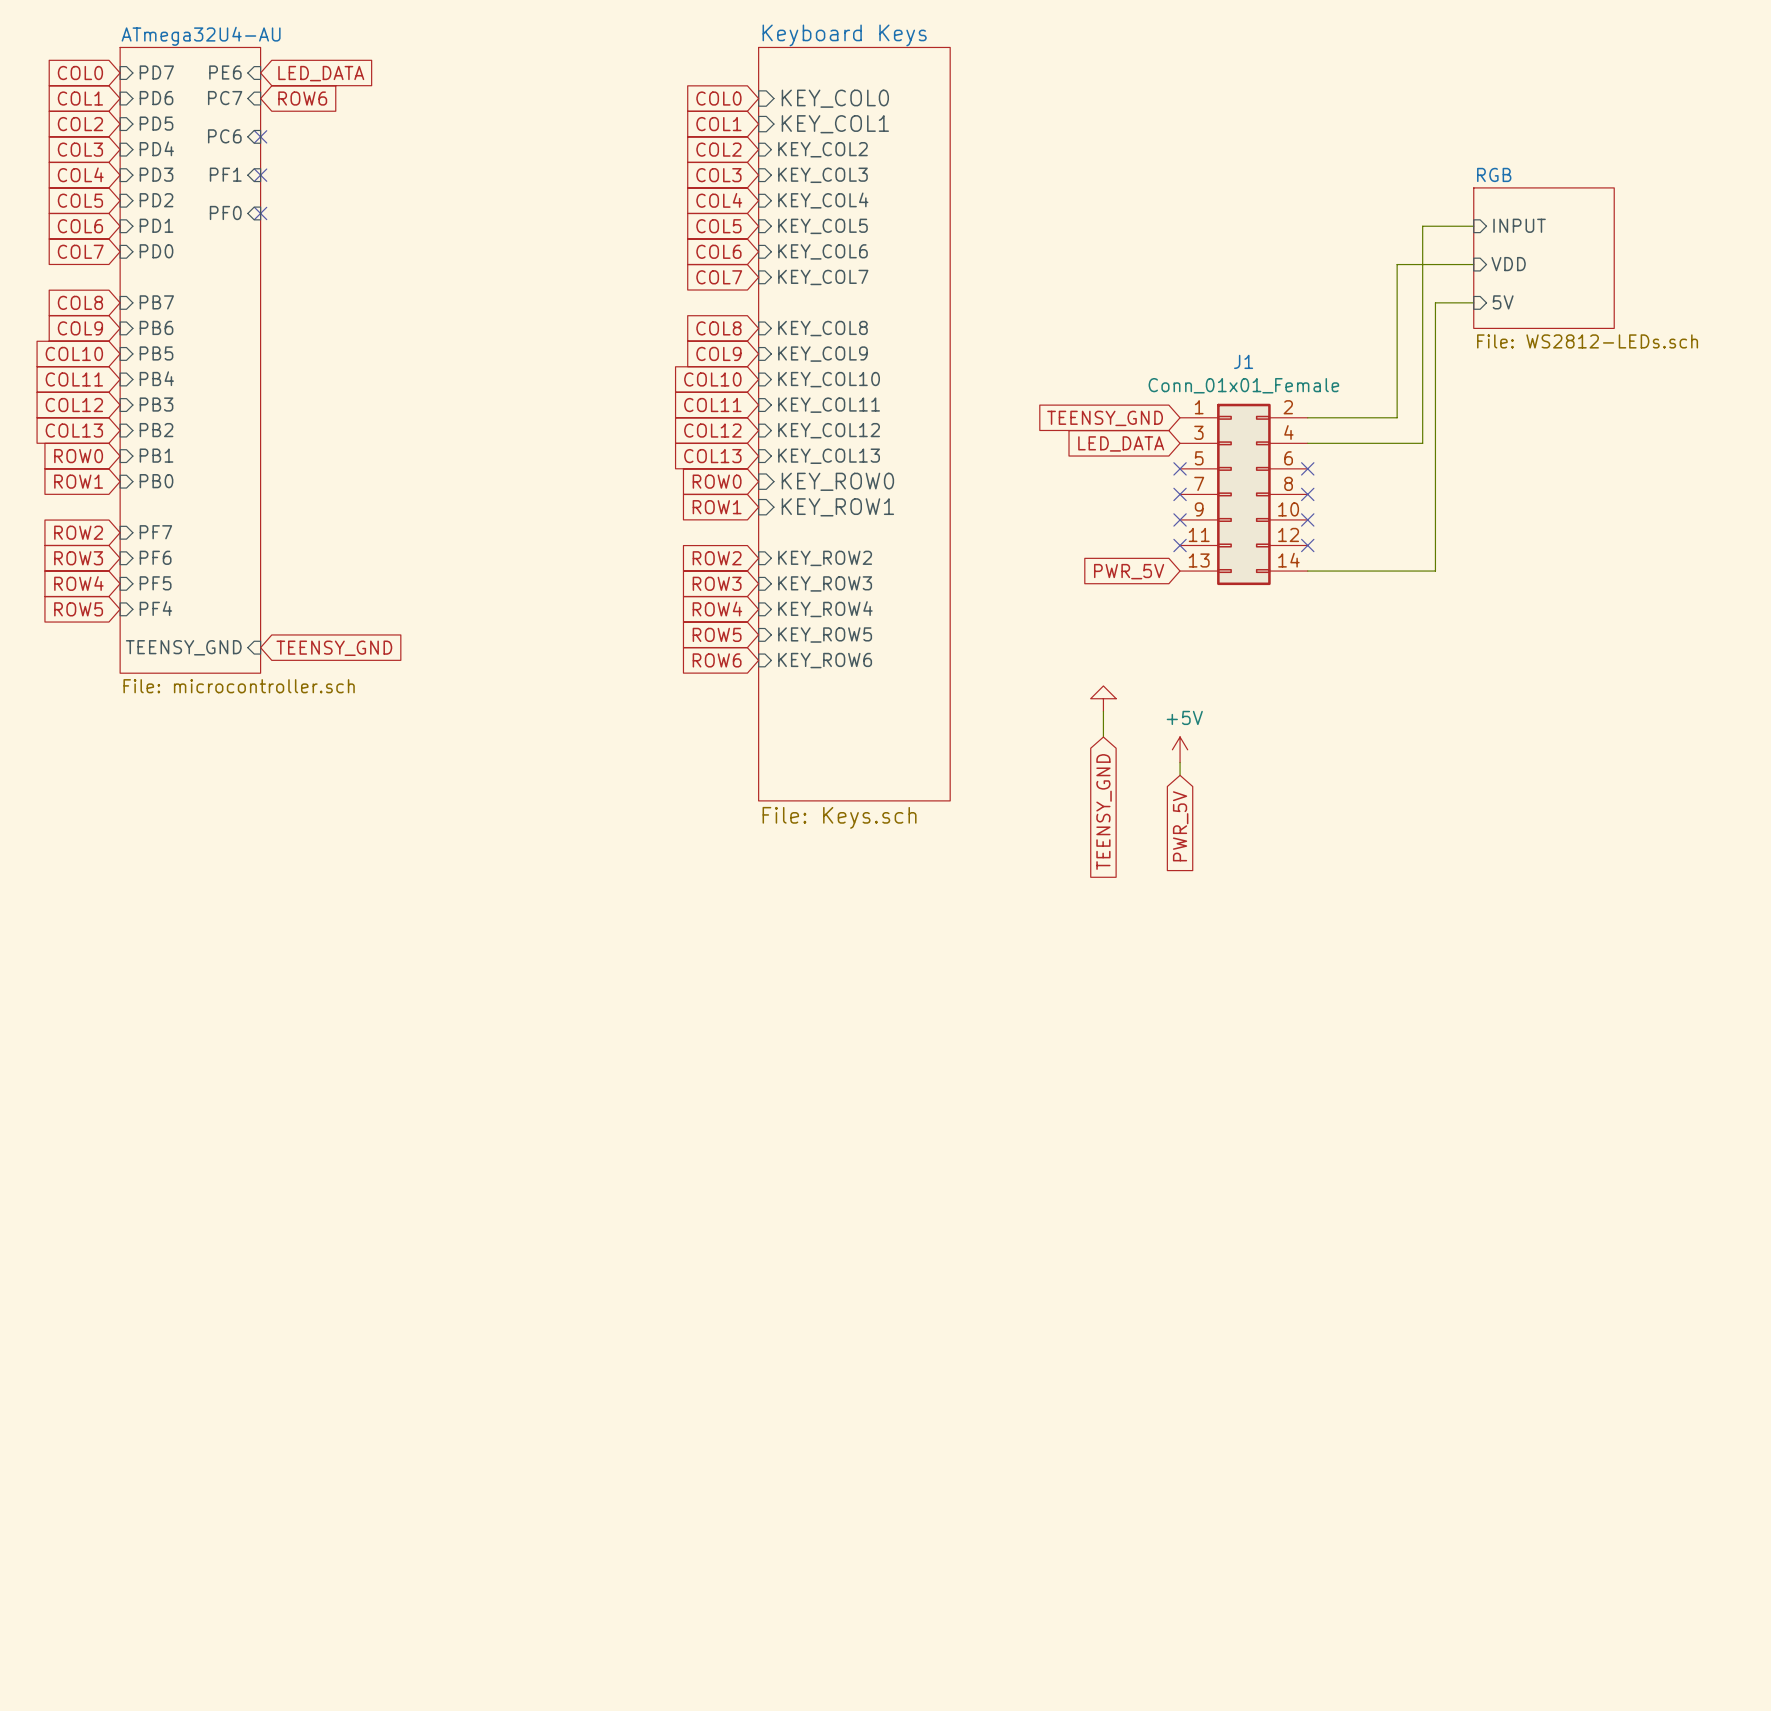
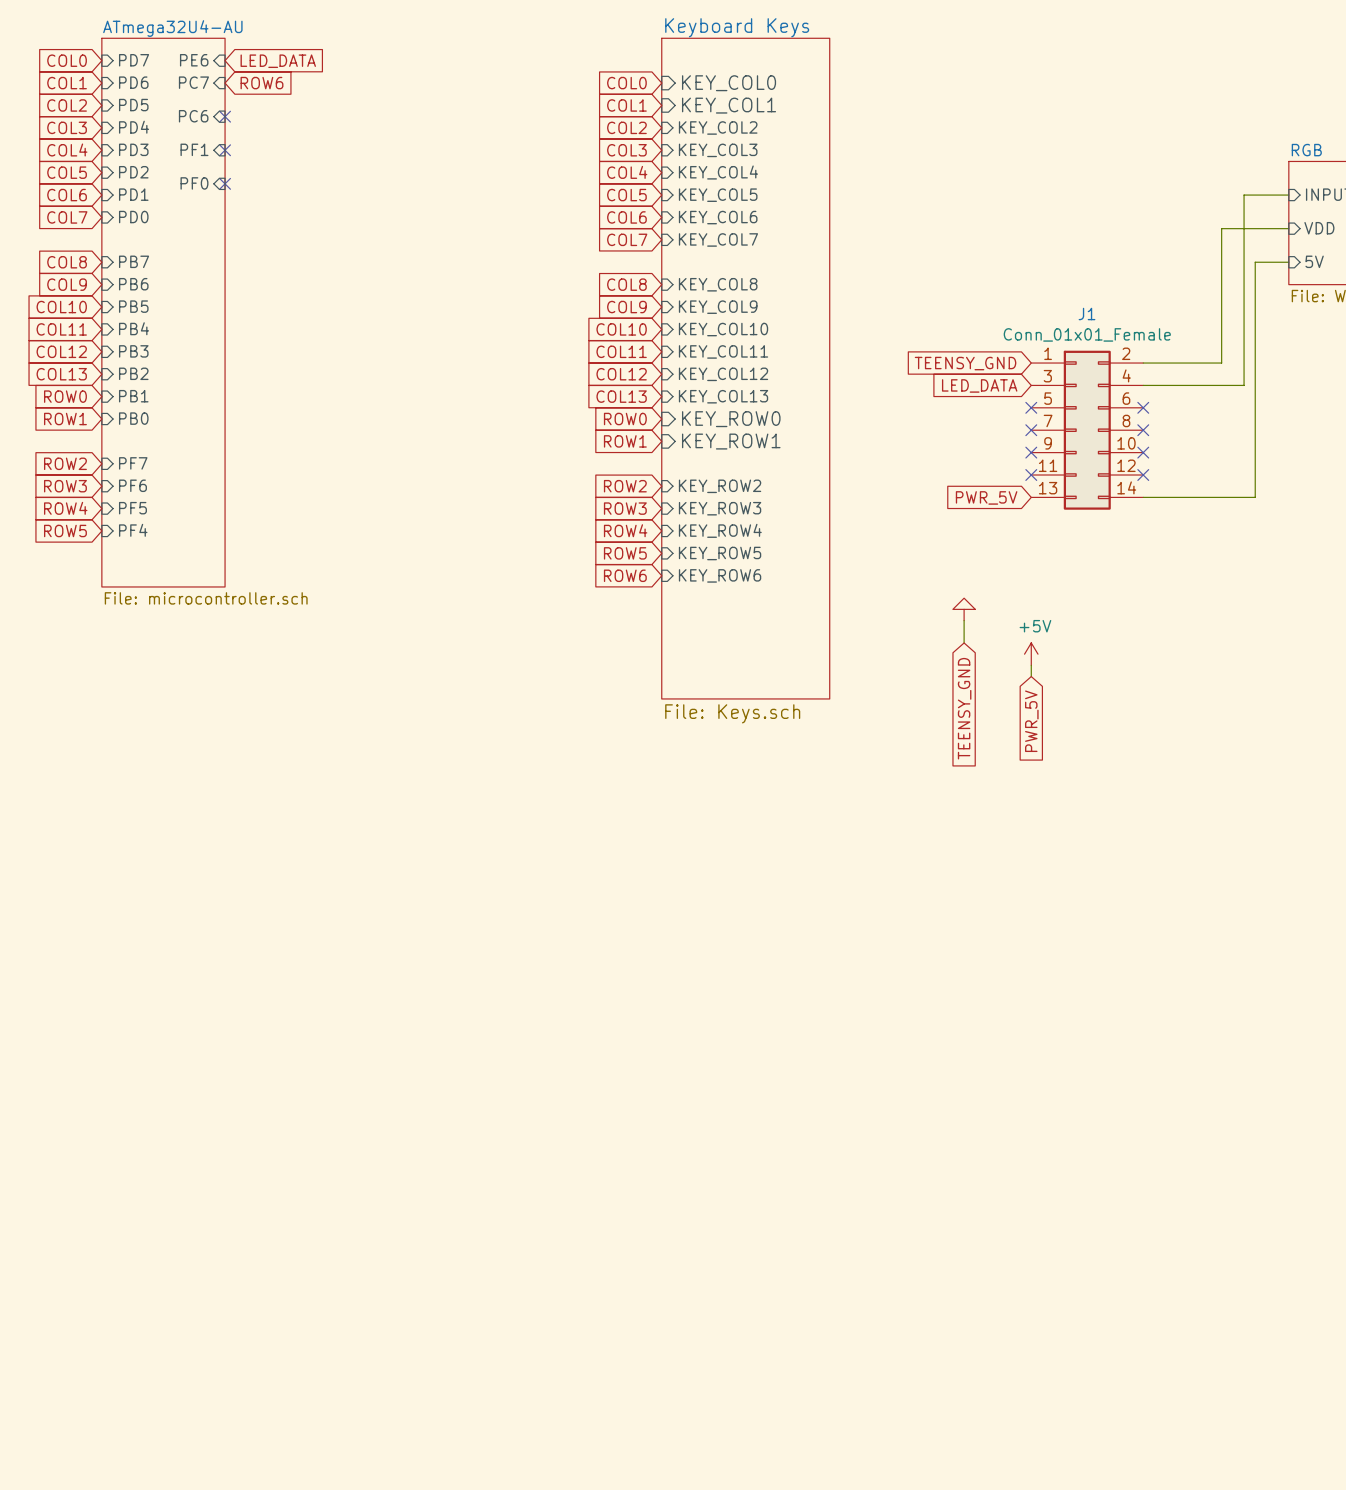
sheet pin: TEENSY_GND (183, 647) -> none
global label: TEENSY_GND (334, 648) -> none

